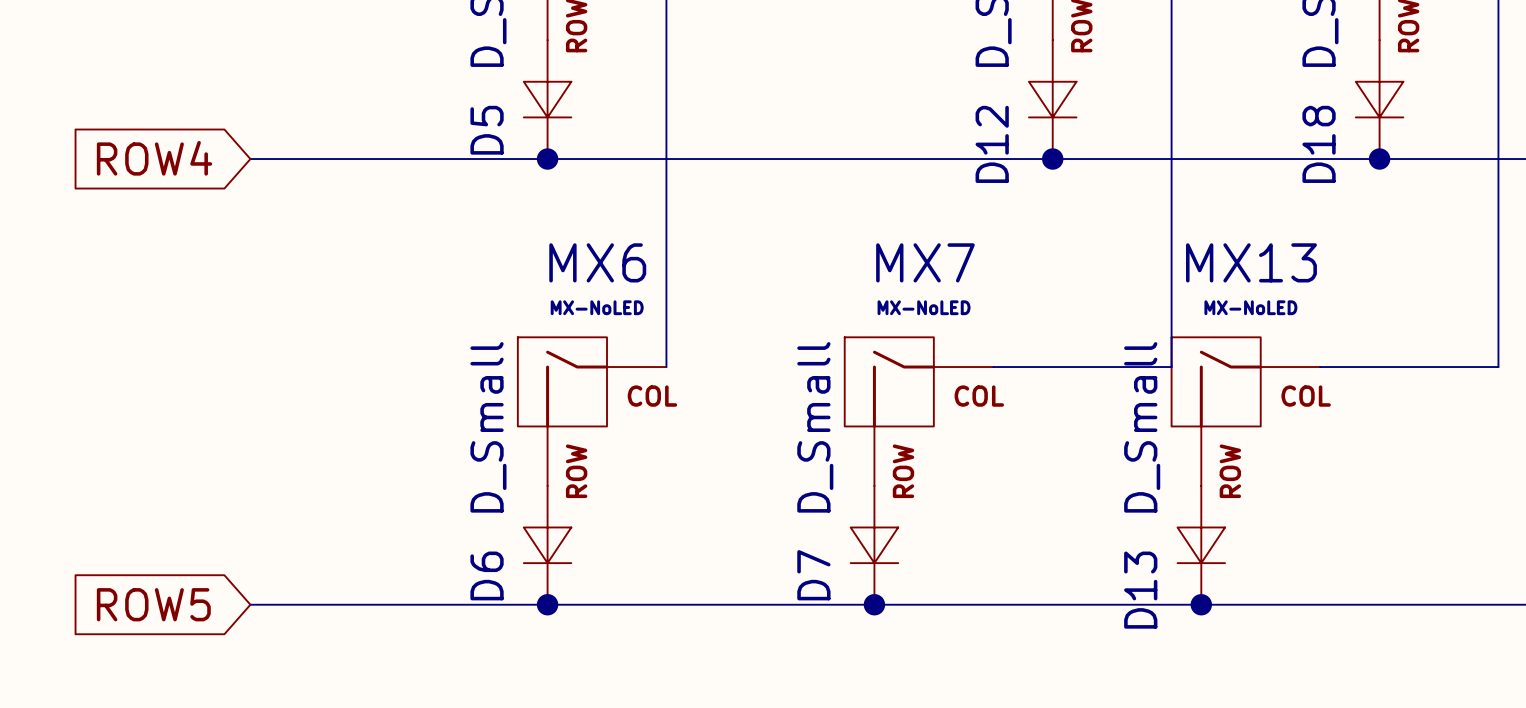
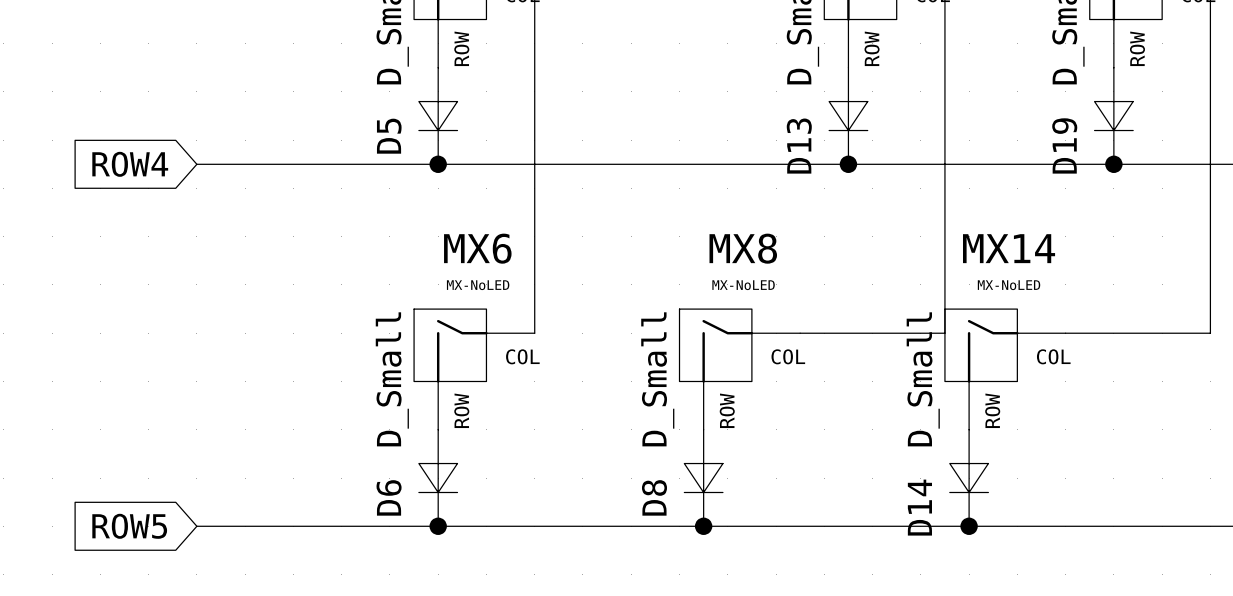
D12 name: D12 (992, 144) -> D13 (799, 146)
D18 name: D18 (1319, 144) -> D19 (1064, 145)
MX7 name: MX7 (925, 262) -> MX8 (743, 248)
MX13 name: MX13 (1251, 262) -> MX14 (1009, 248)
D7 name: D7 (813, 575) -> D8 (654, 497)
D13 name: D13 (1140, 590) -> D14 (919, 507)

